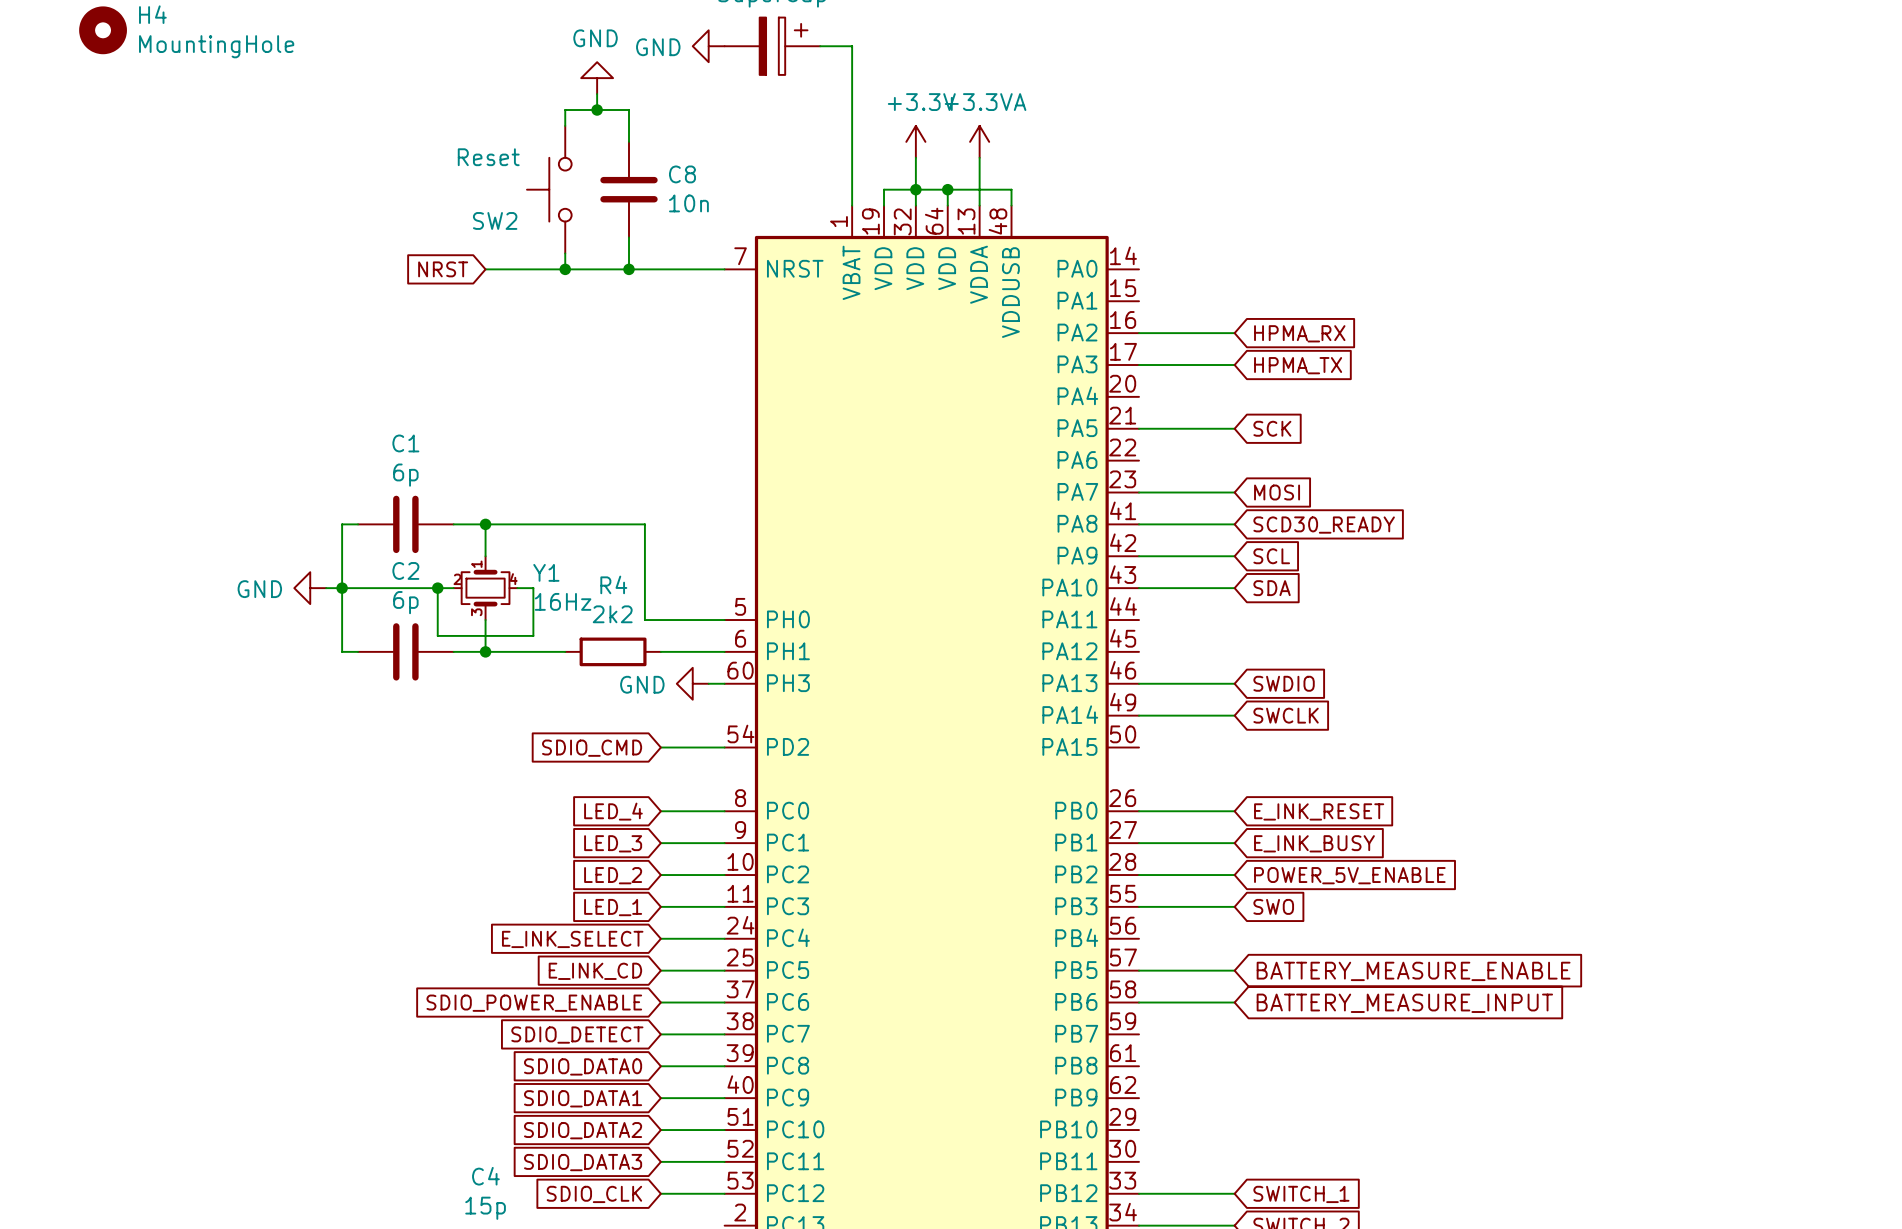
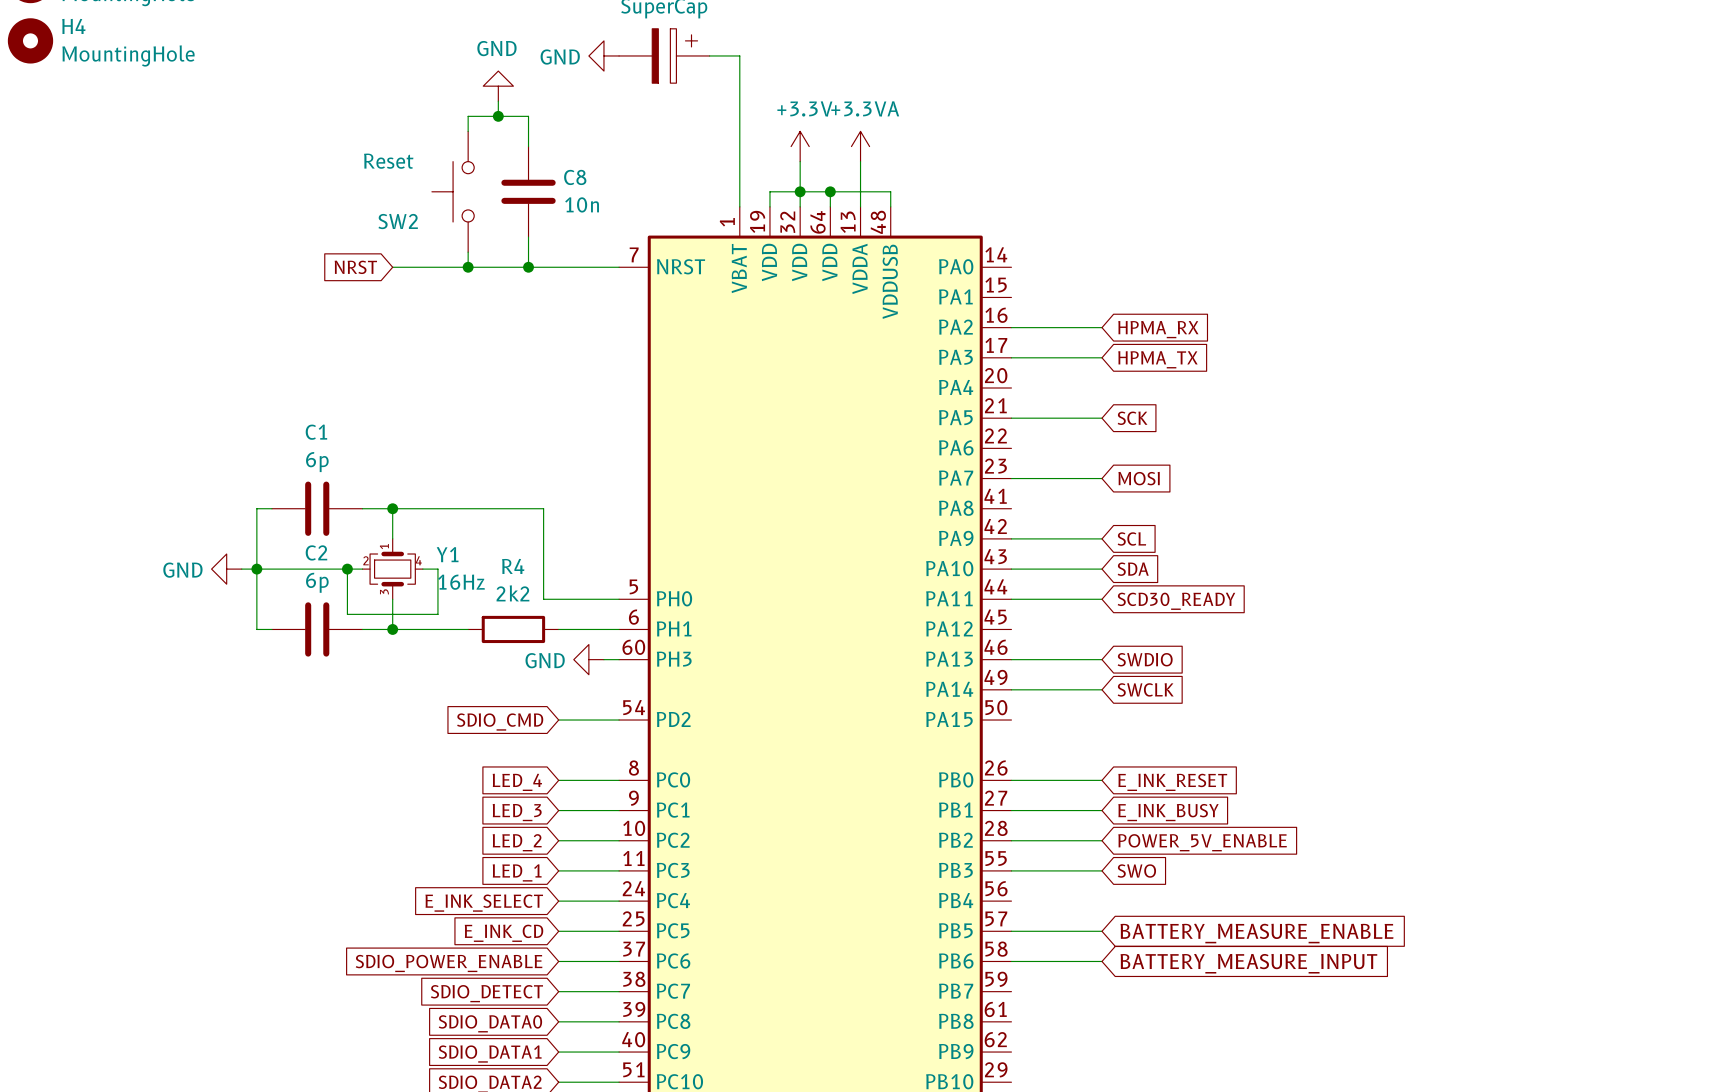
wire: (1139, 524) (1234, 524) -> (1011, 599) (1101, 599)
global label position: SCD30_READY (1324, 525) -> SCD30_READY (1176, 601)

